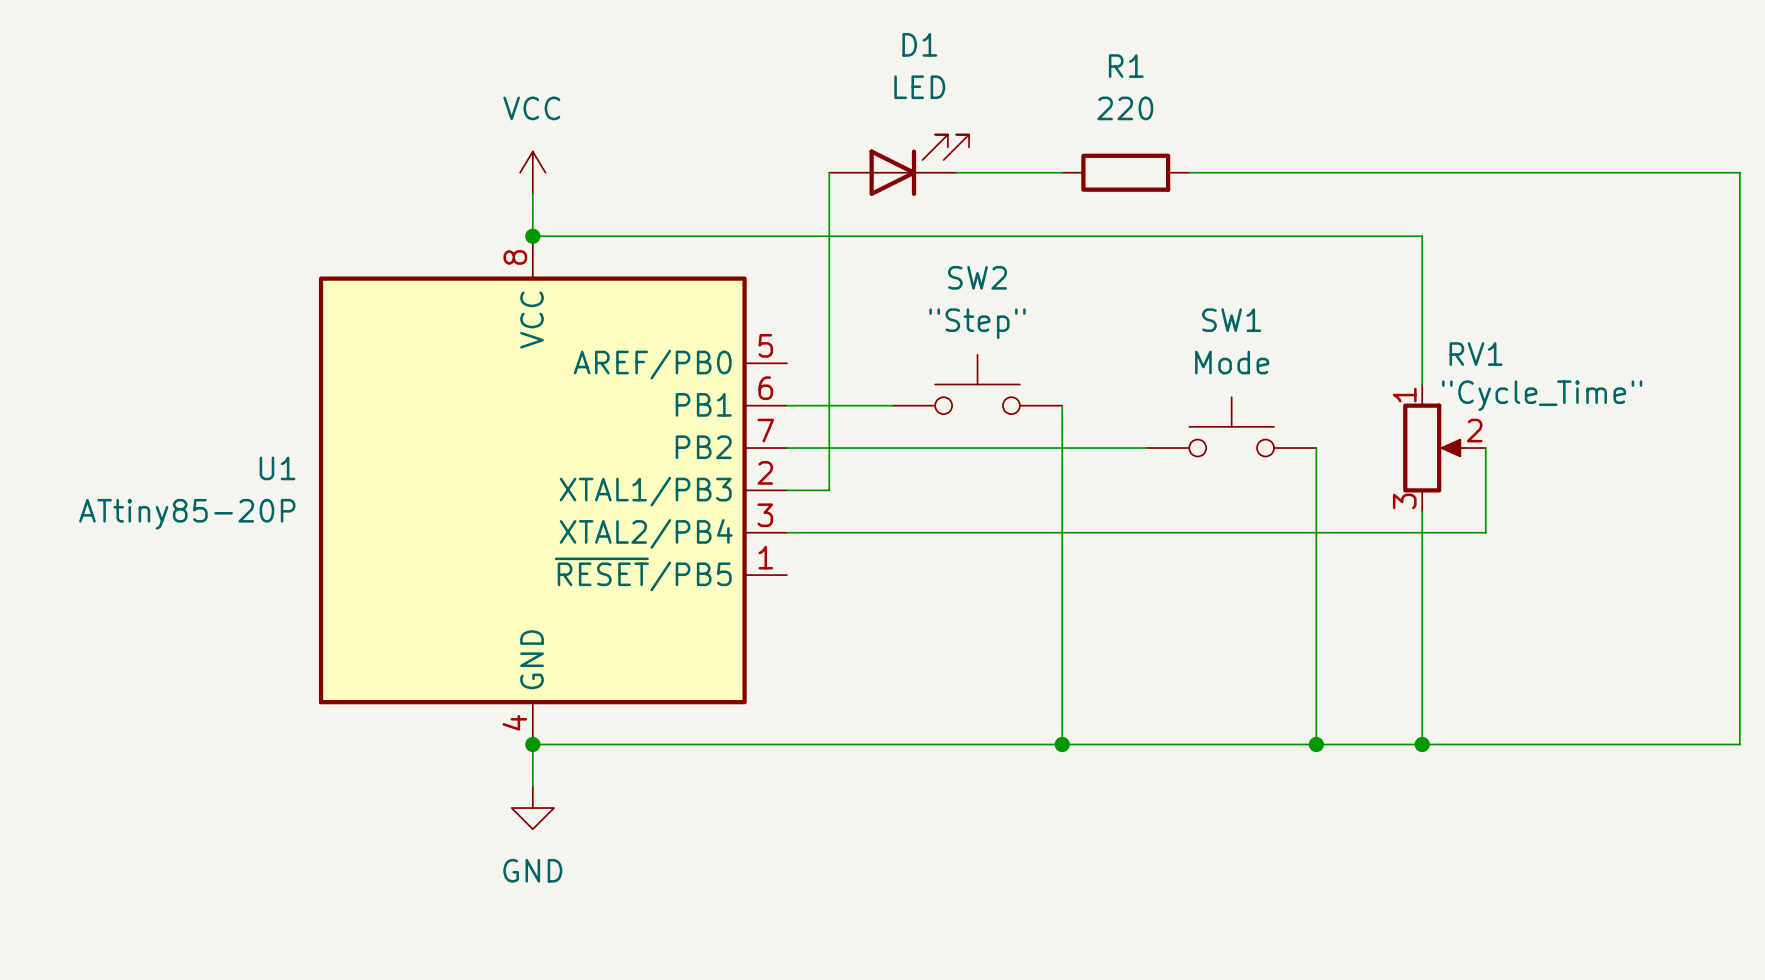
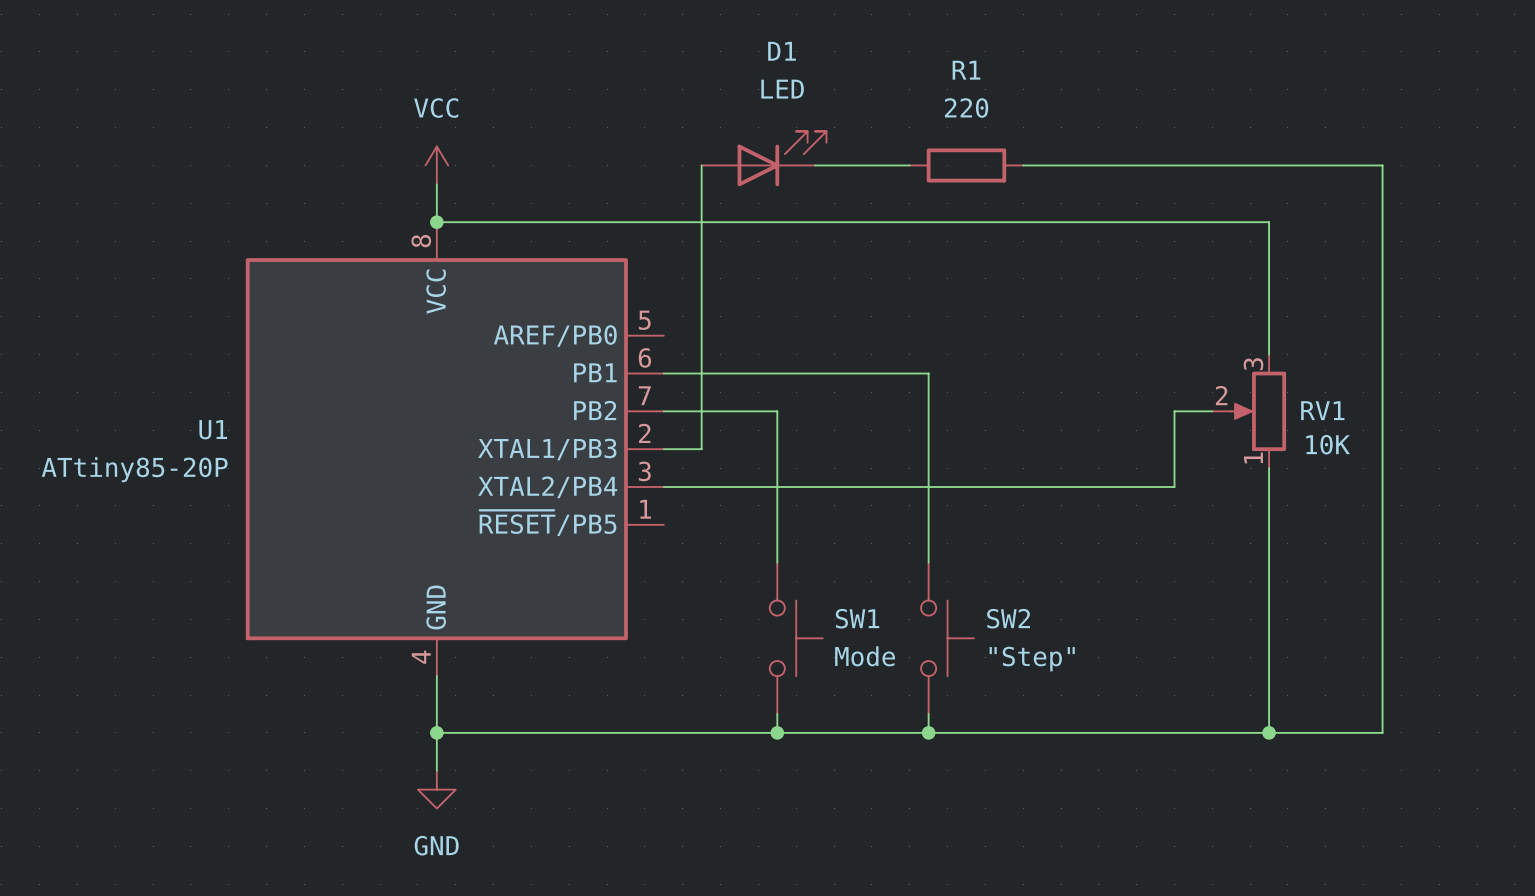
wire: (1591, 172) (1739, 172) (1739, 744) (532, 744) -> (1382, 165) (1382, 732) (436, 732)
wire: (1422, 236) (1422, 384) -> (1231, 222) (1269, 222) (1269, 354)
SW2 value position: "Step" (977, 323) -> "Step" (1032, 659)
RV1 name position: RV1 (1476, 354) -> RV1 (1322, 410)
SW1 value position: Mode (1232, 362) -> Mode (865, 656)
SW2 rotation: 0° (977, 384) -> 90° clockwise (947, 638)
SW2 position: (977, 384) -> (947, 638)
RV1 value: "Cycle_Time" (1542, 395) -> 10K (1328, 444)
wire: none -> (758, 373) (928, 373) (928, 562)
wire: (1062, 405) (1062, 744) -> none
SW1 rotation: 0° (1231, 426) -> 90° clockwise (796, 638)
SW1 position: (1231, 426) -> (796, 638)
wire: (913, 448) (1146, 448) -> (777, 411) (777, 562)
wire: (1316, 448) (1316, 744) -> (1269, 468) (1269, 732)
RV1 rotation: 0° (1433, 448) -> 180° (1258, 411)
wire: (1485, 448) (1485, 532) (1358, 532) -> (1212, 411) (1174, 411) (1174, 487)
wire: (1422, 511) (1422, 744) -> none
junction position: (532, 744) -> (436, 732)
junction position: (1062, 744) -> (928, 732)
junction: (1316, 744) -> none
junction position: (1422, 744) -> (1269, 732)
wire: none -> (436, 713) (436, 770)
wire: none -> (777, 713) (777, 732)
wire: none -> (928, 713) (928, 732)
power symbol position: GND (532, 808) -> GND (436, 789)
junction: none -> (777, 732)

